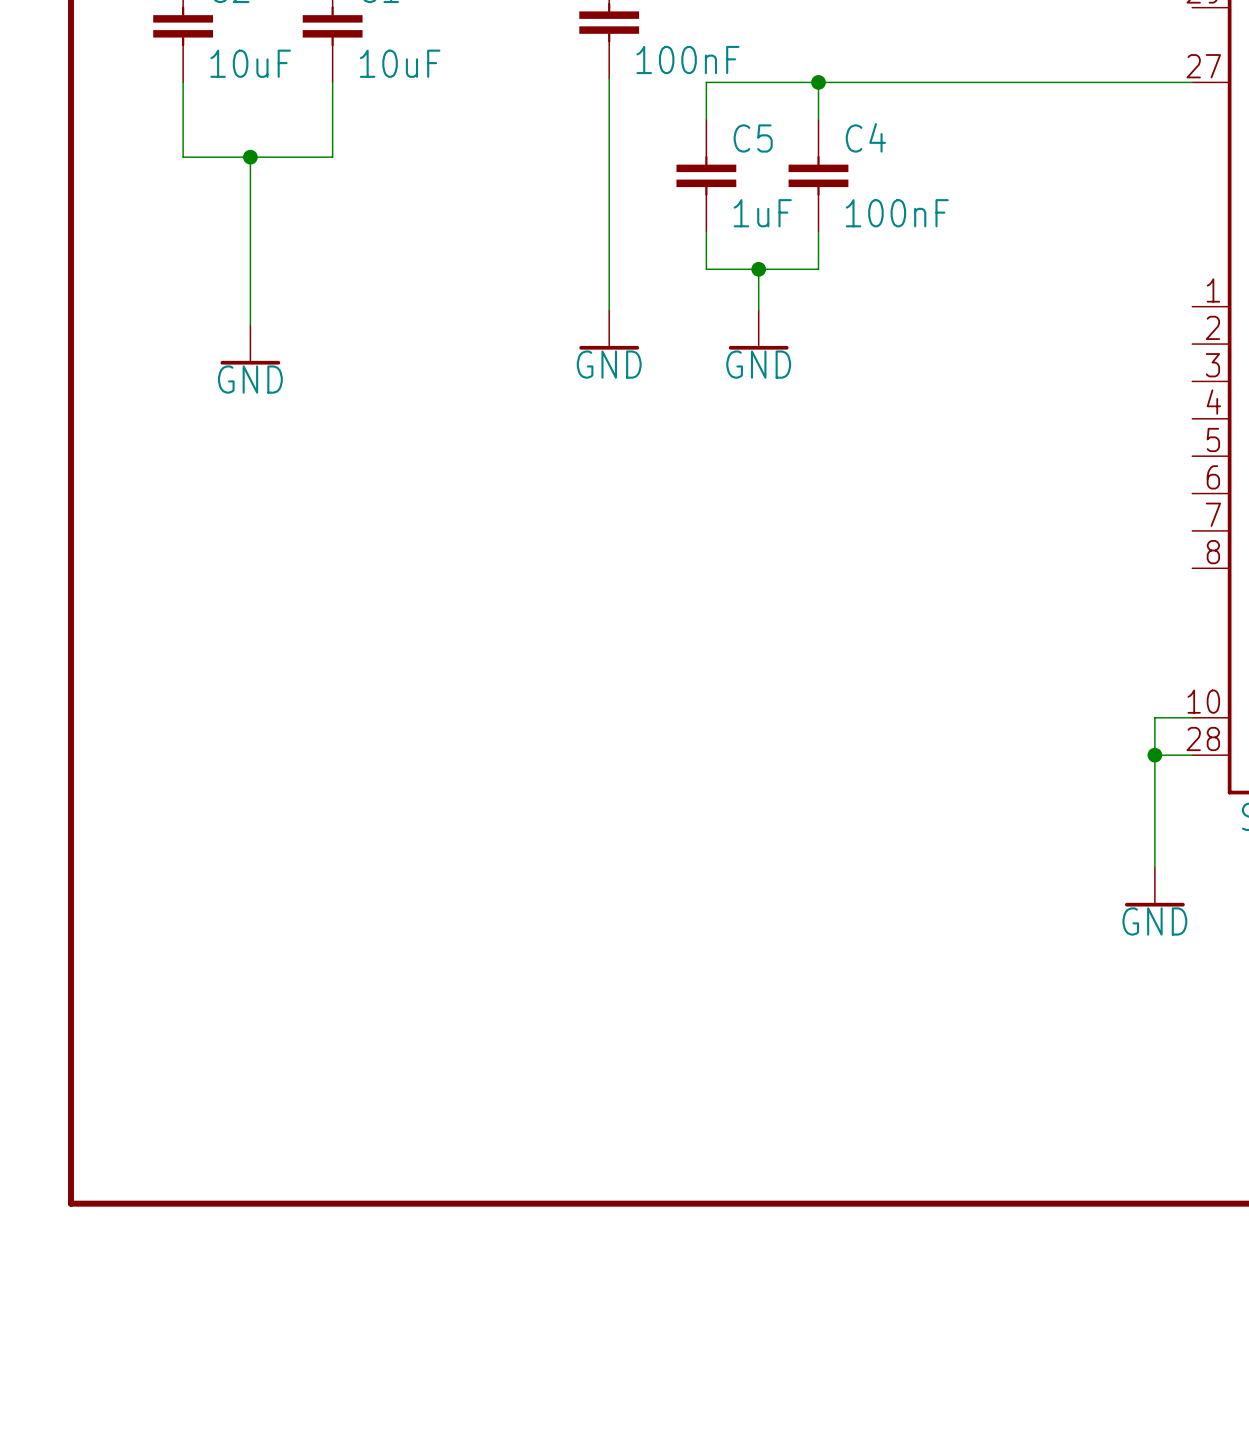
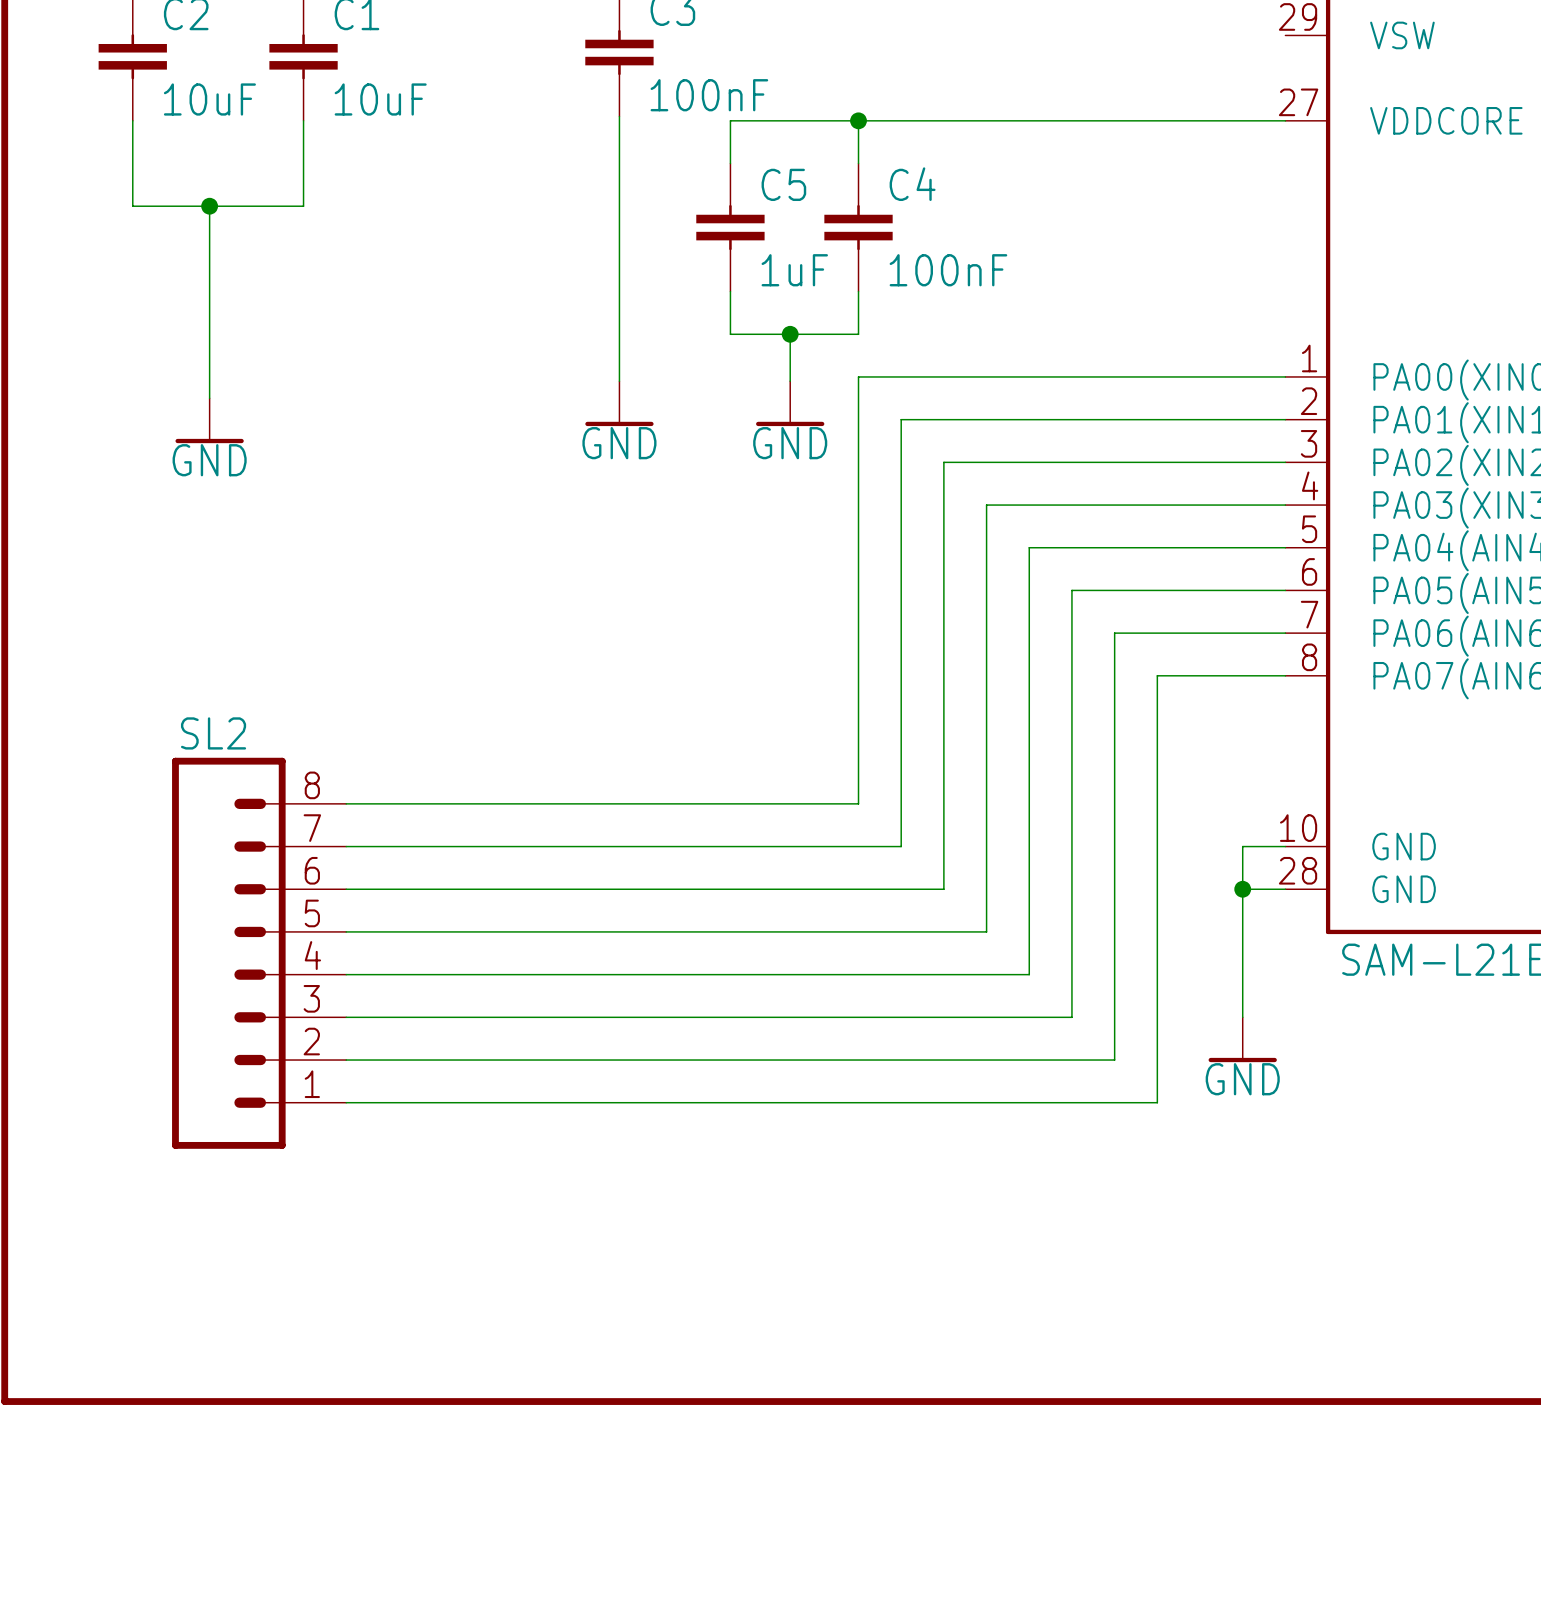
wire: none -> (1285, 376) (858, 376) (858, 803) (346, 803)
wire: none -> (1285, 419) (901, 419) (901, 846) (346, 846)
wire: none -> (1285, 462) (943, 462) (943, 889) (346, 889)
wire: none -> (1285, 505) (986, 505) (986, 931) (346, 931)
wire: none -> (1285, 547) (1029, 547) (1029, 974) (346, 974)
wire: none -> (1285, 590) (1071, 590) (1071, 1017) (346, 1017)
wire: none -> (1285, 633) (1114, 633) (1114, 1060) (346, 1060)
wire: none -> (1285, 675) (1157, 675) (1157, 1102) (346, 1102)
SL2: none -> (259, 953)

